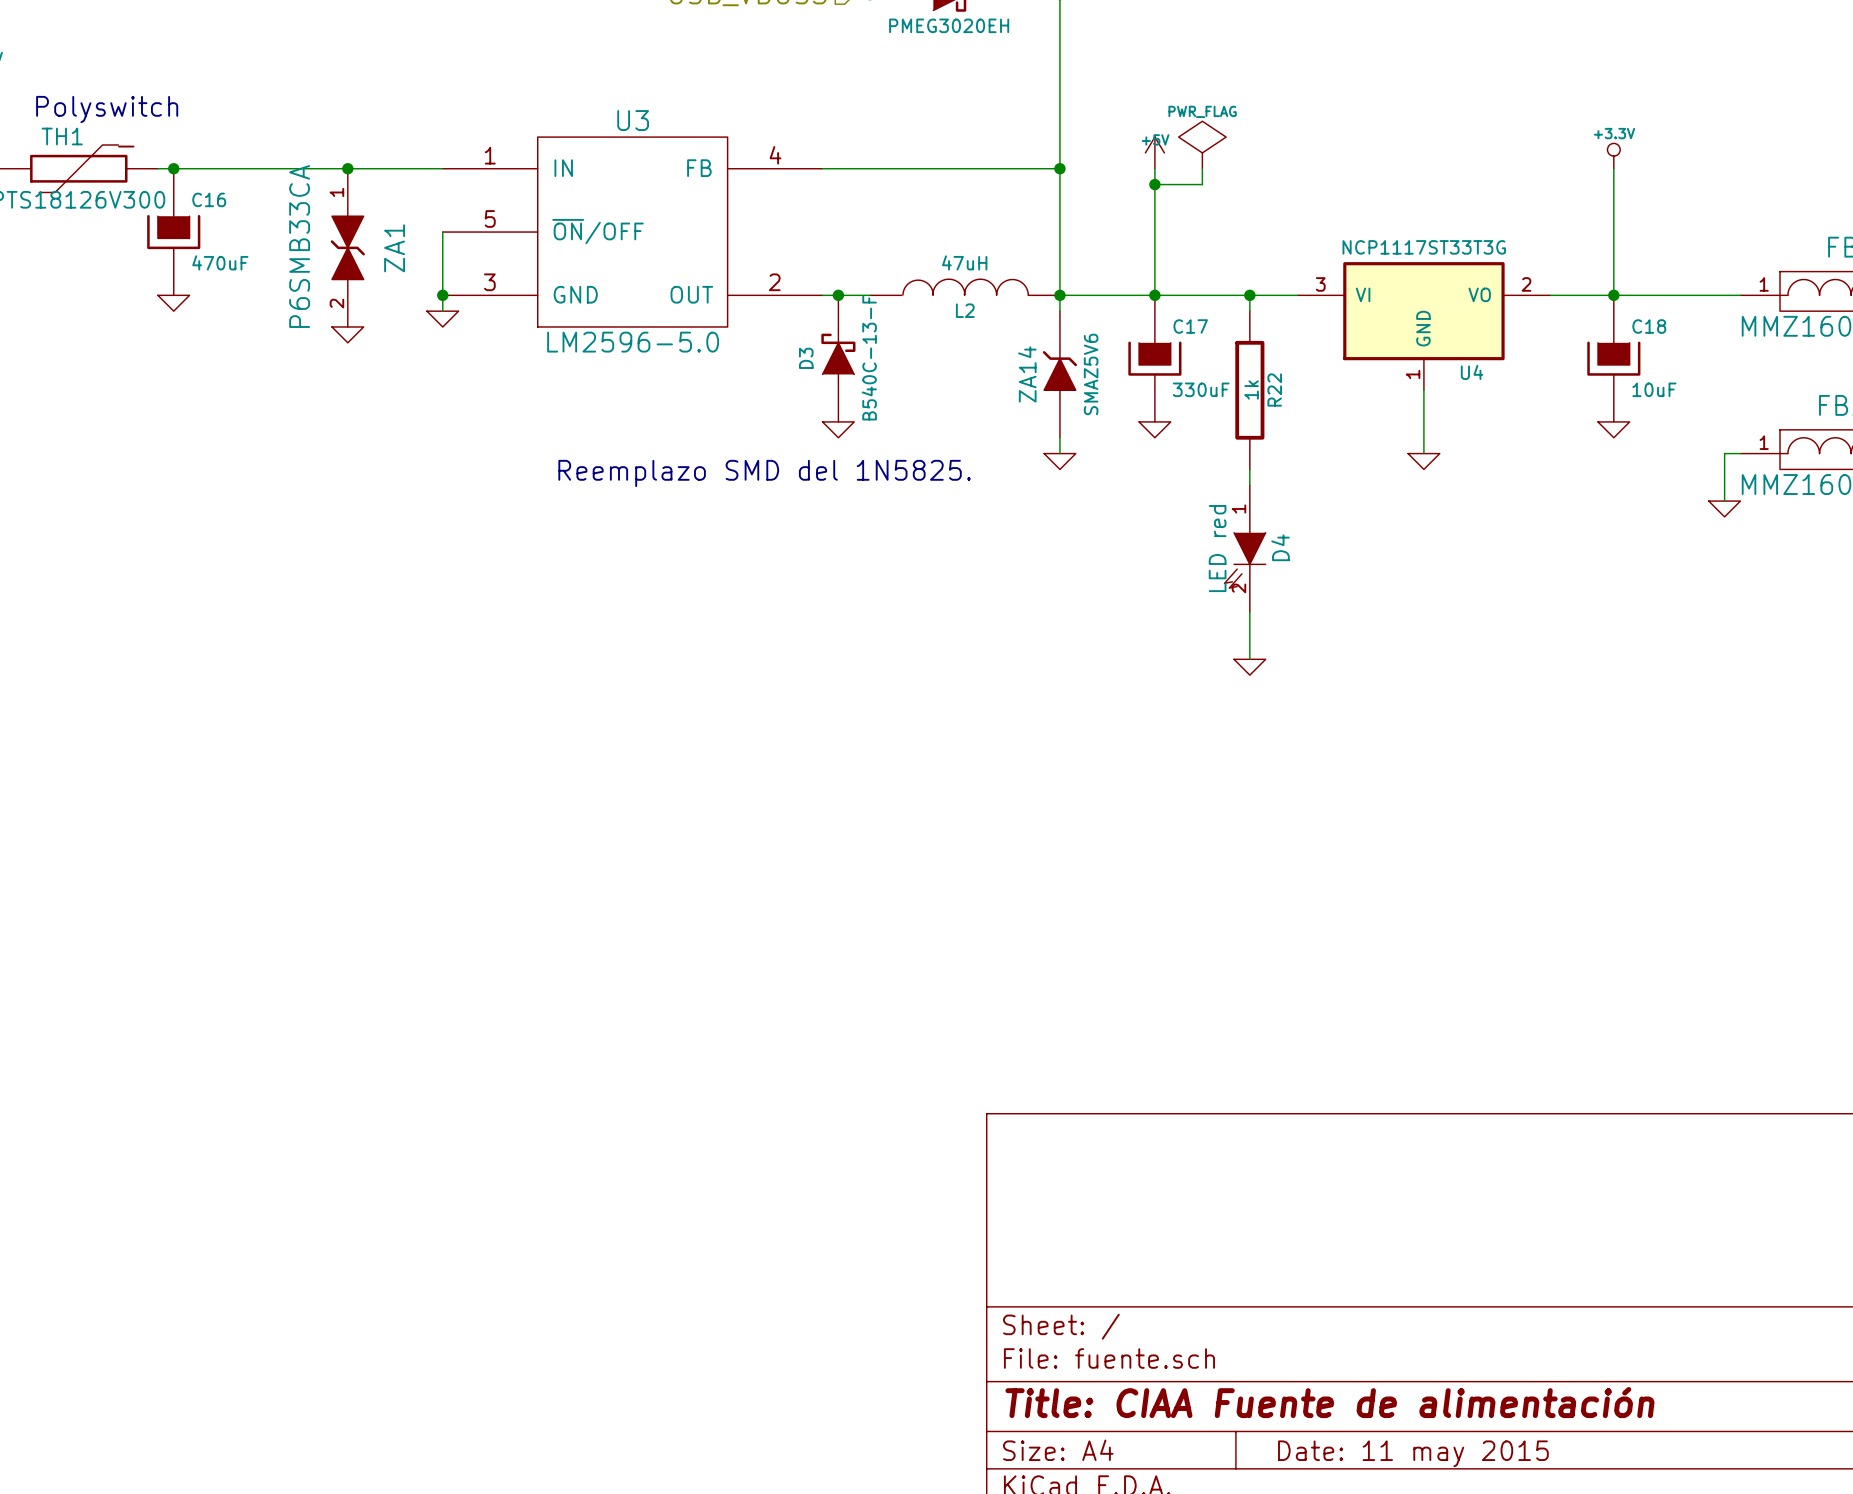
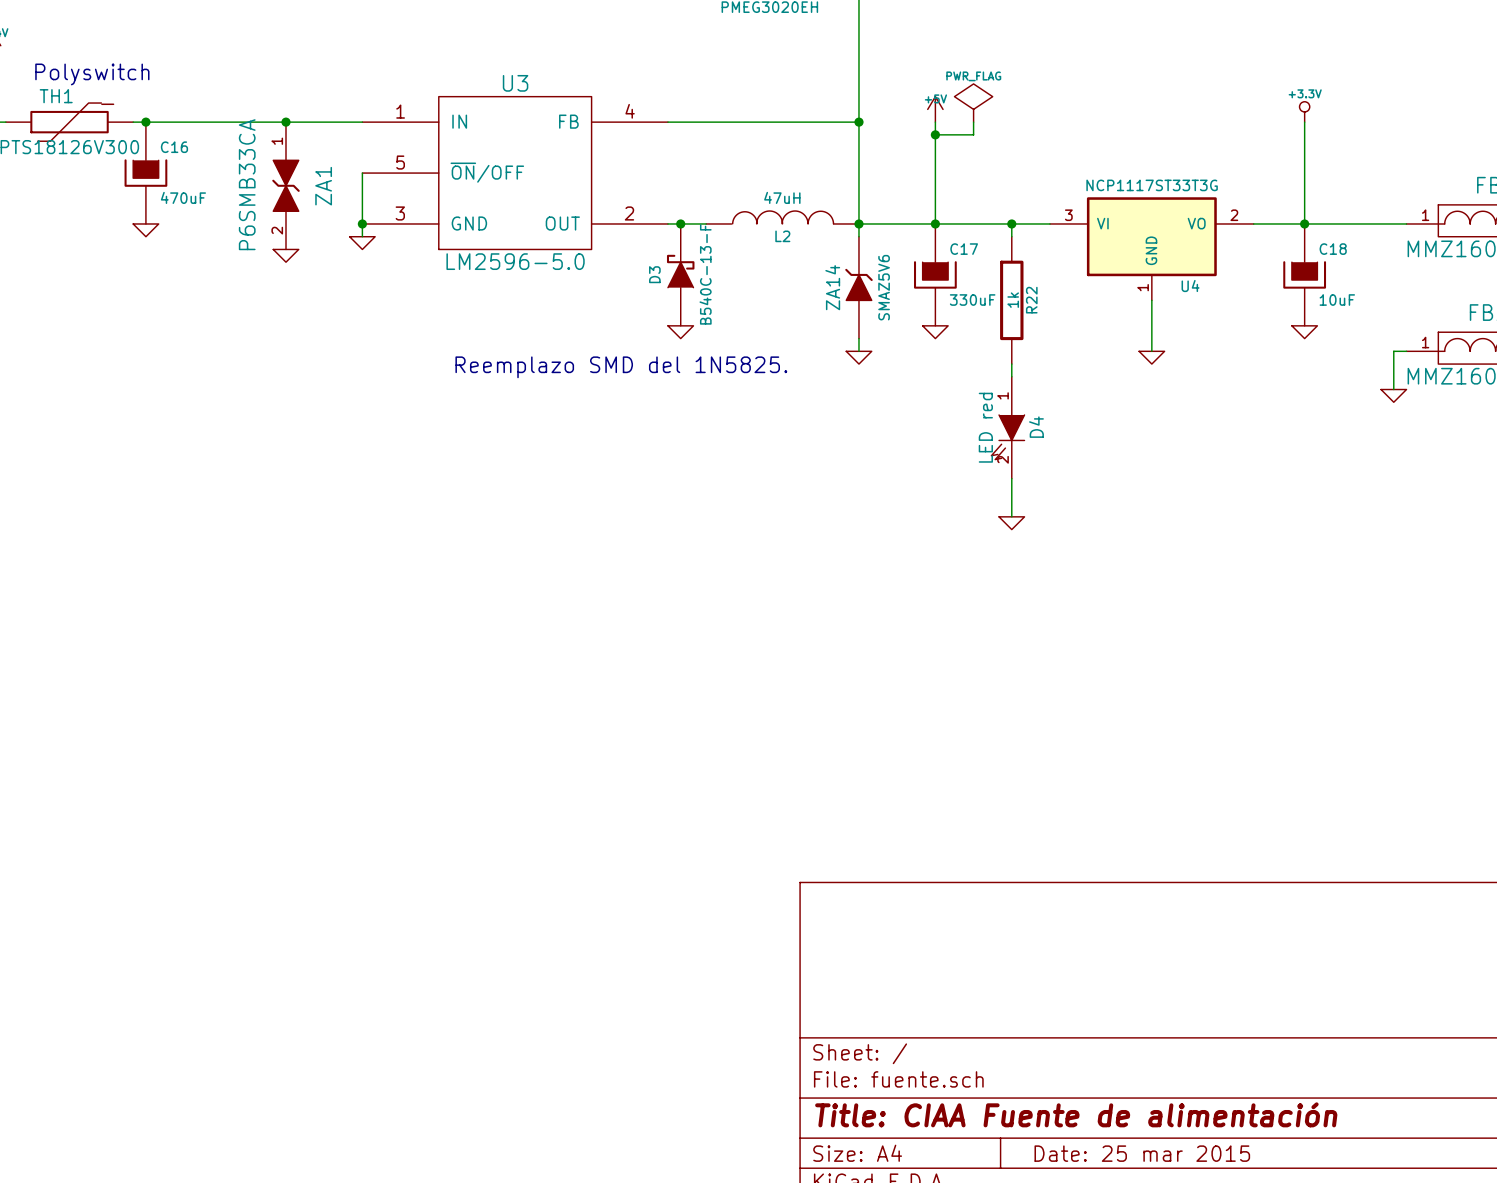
title block: Date: 11 may 2015 (1413, 1453) -> Date: 25 mar 2015 (1142, 1153)

